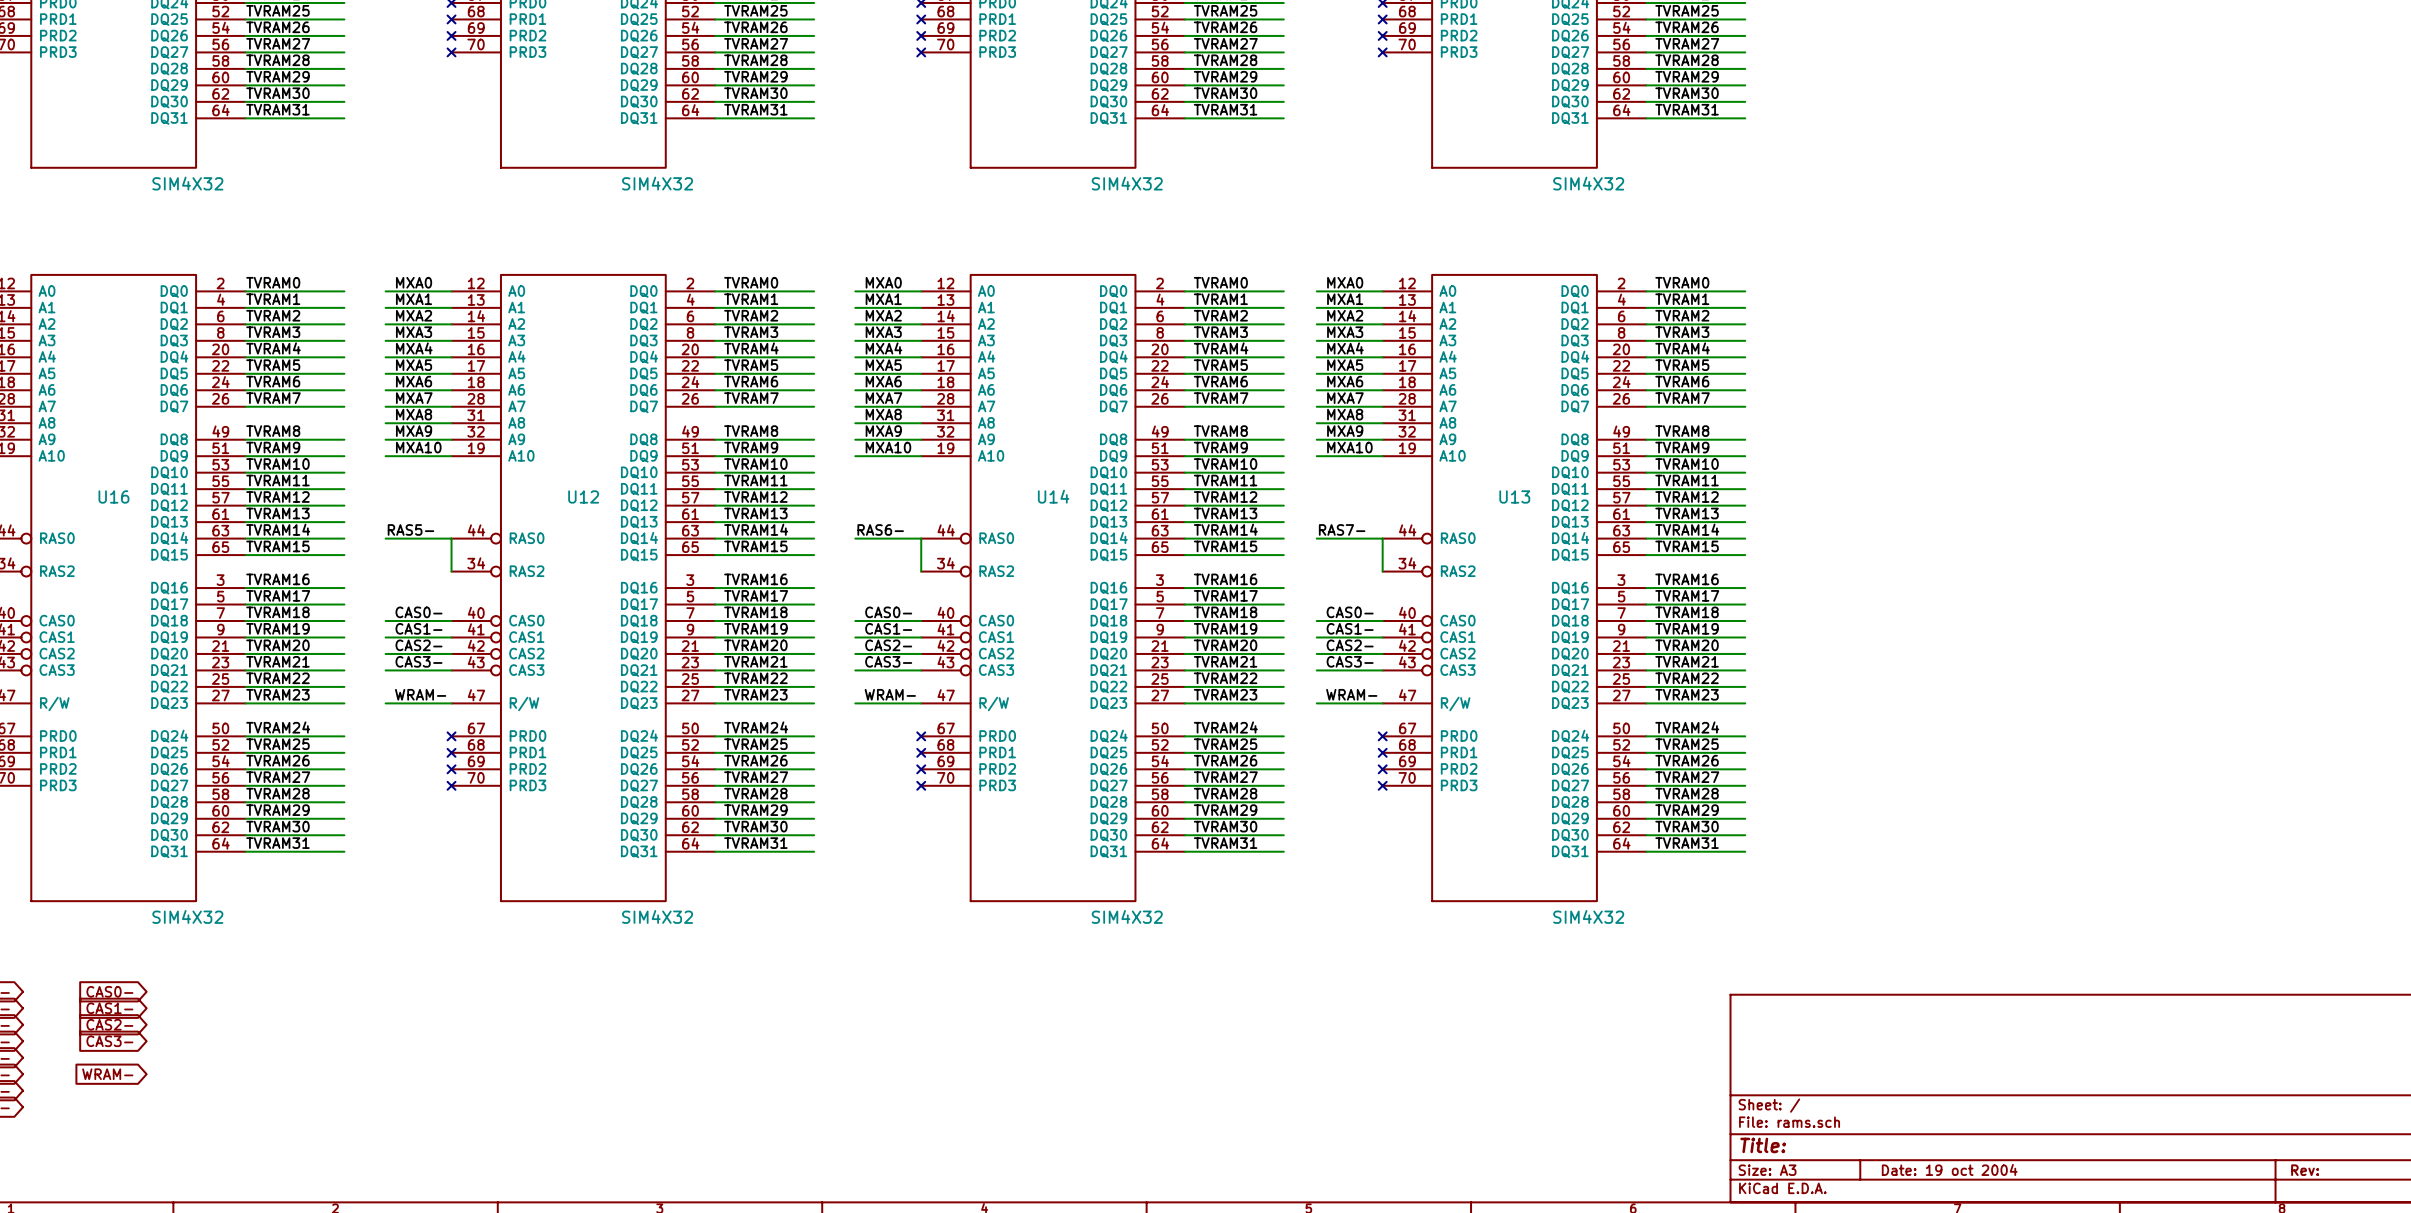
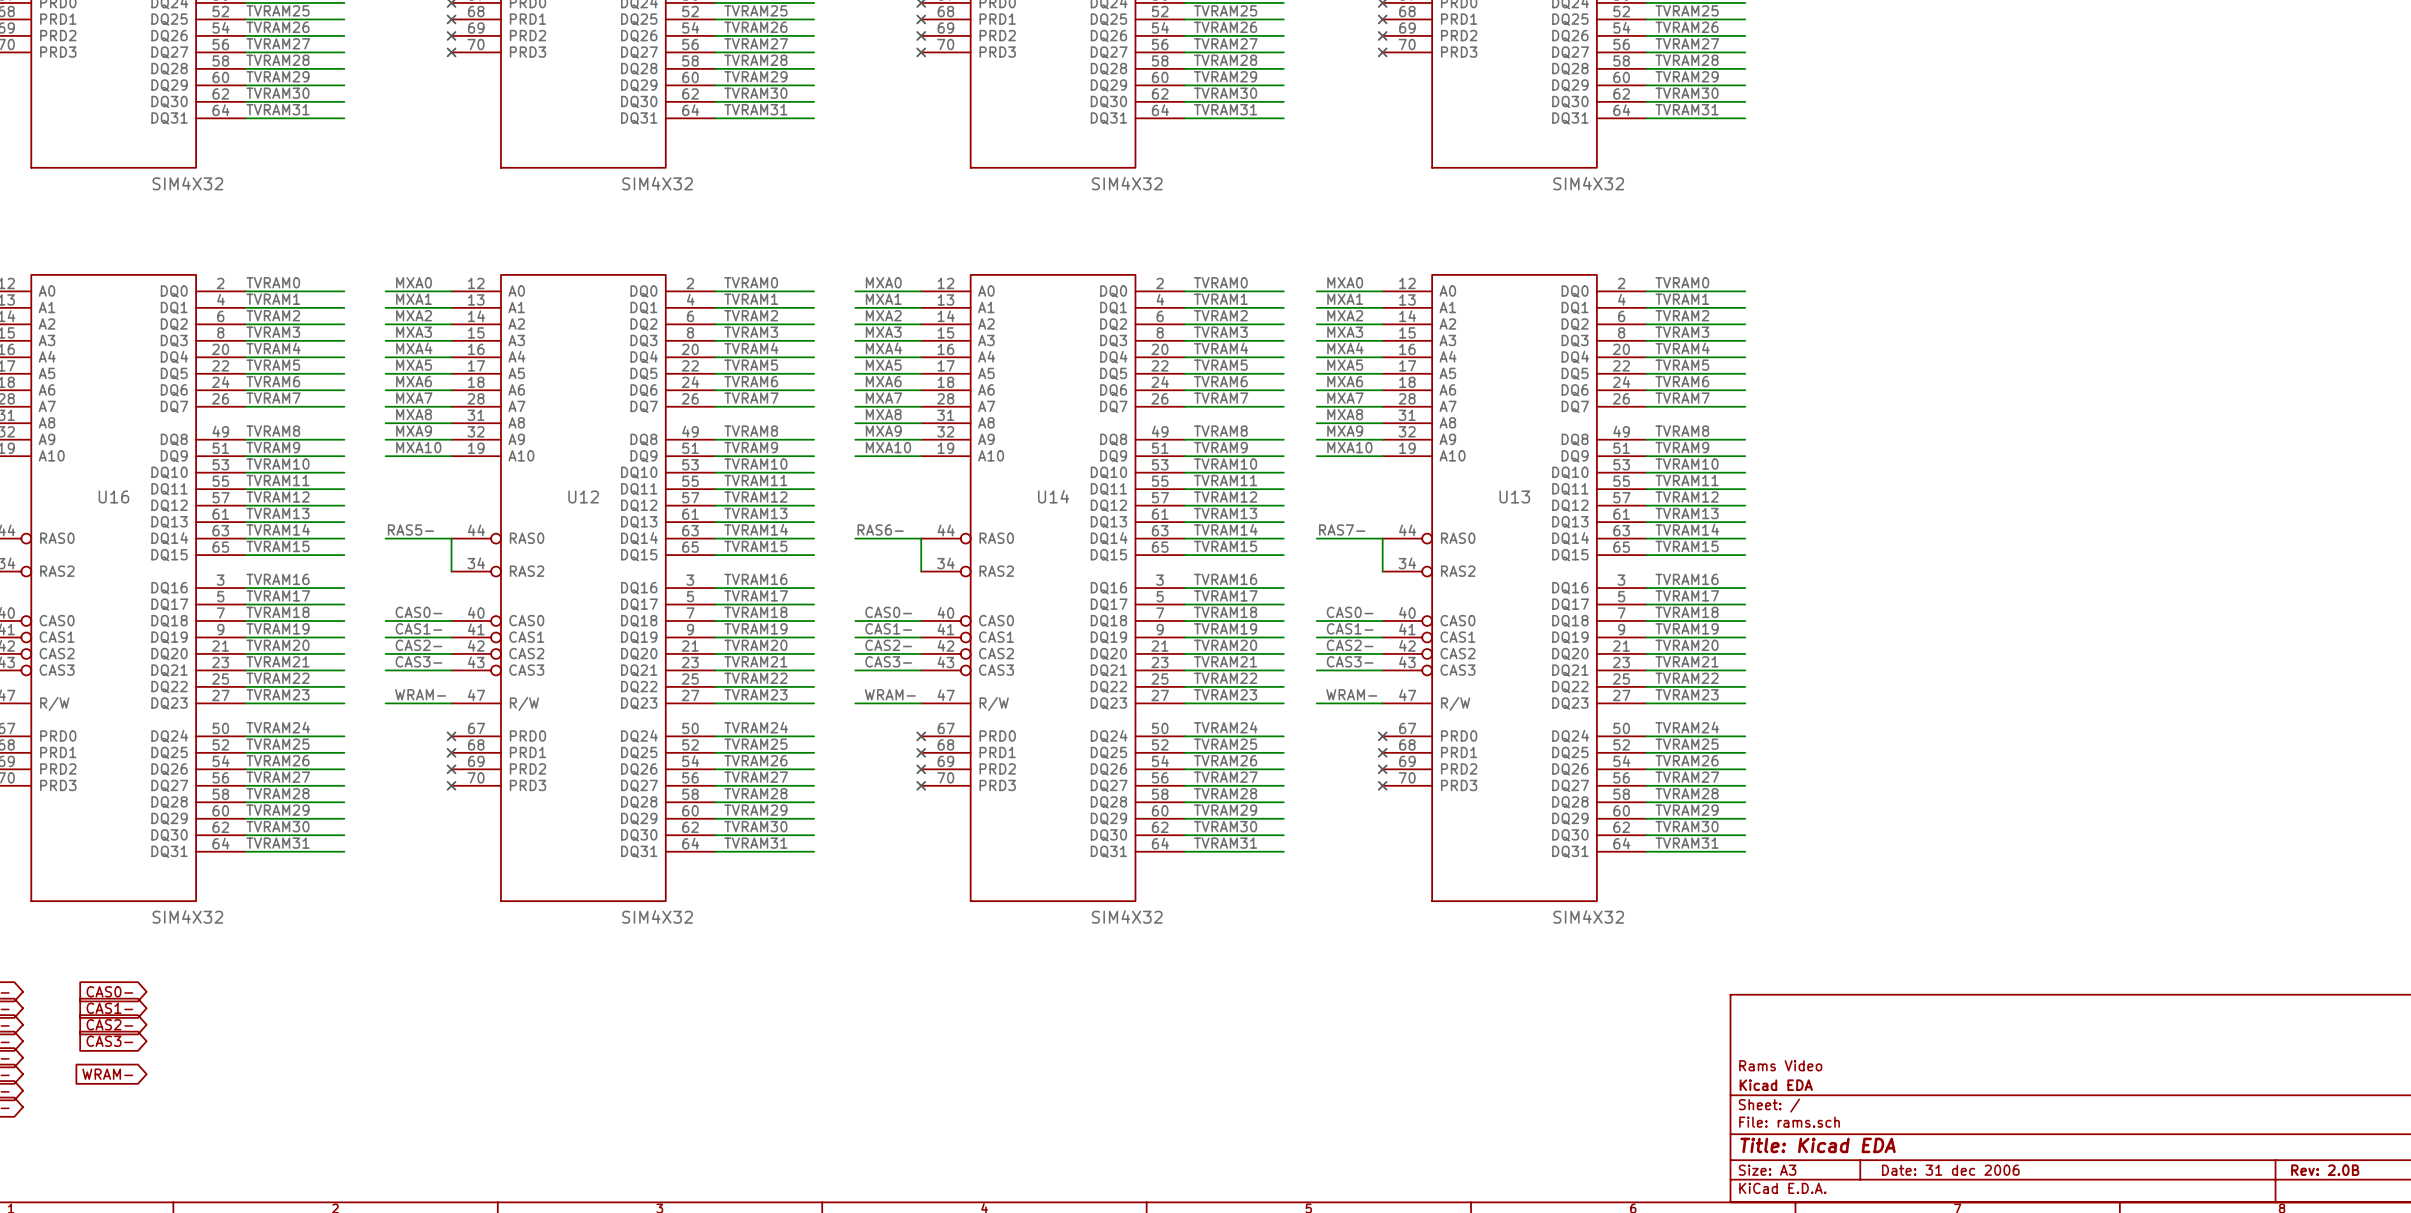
title block: none -> Rams Video (1780, 1065)
title block: none -> Kicad EDA (1776, 1085)
title block: Title: (1763, 1145) -> Title: Kicad EDA (1817, 1145)
title block: Date: 19 oct 2004 (1949, 1169) -> Date: 31 dec 2006 (1950, 1170)
title block: Rev: (2305, 1170) -> Rev: 2.0B (2325, 1170)

